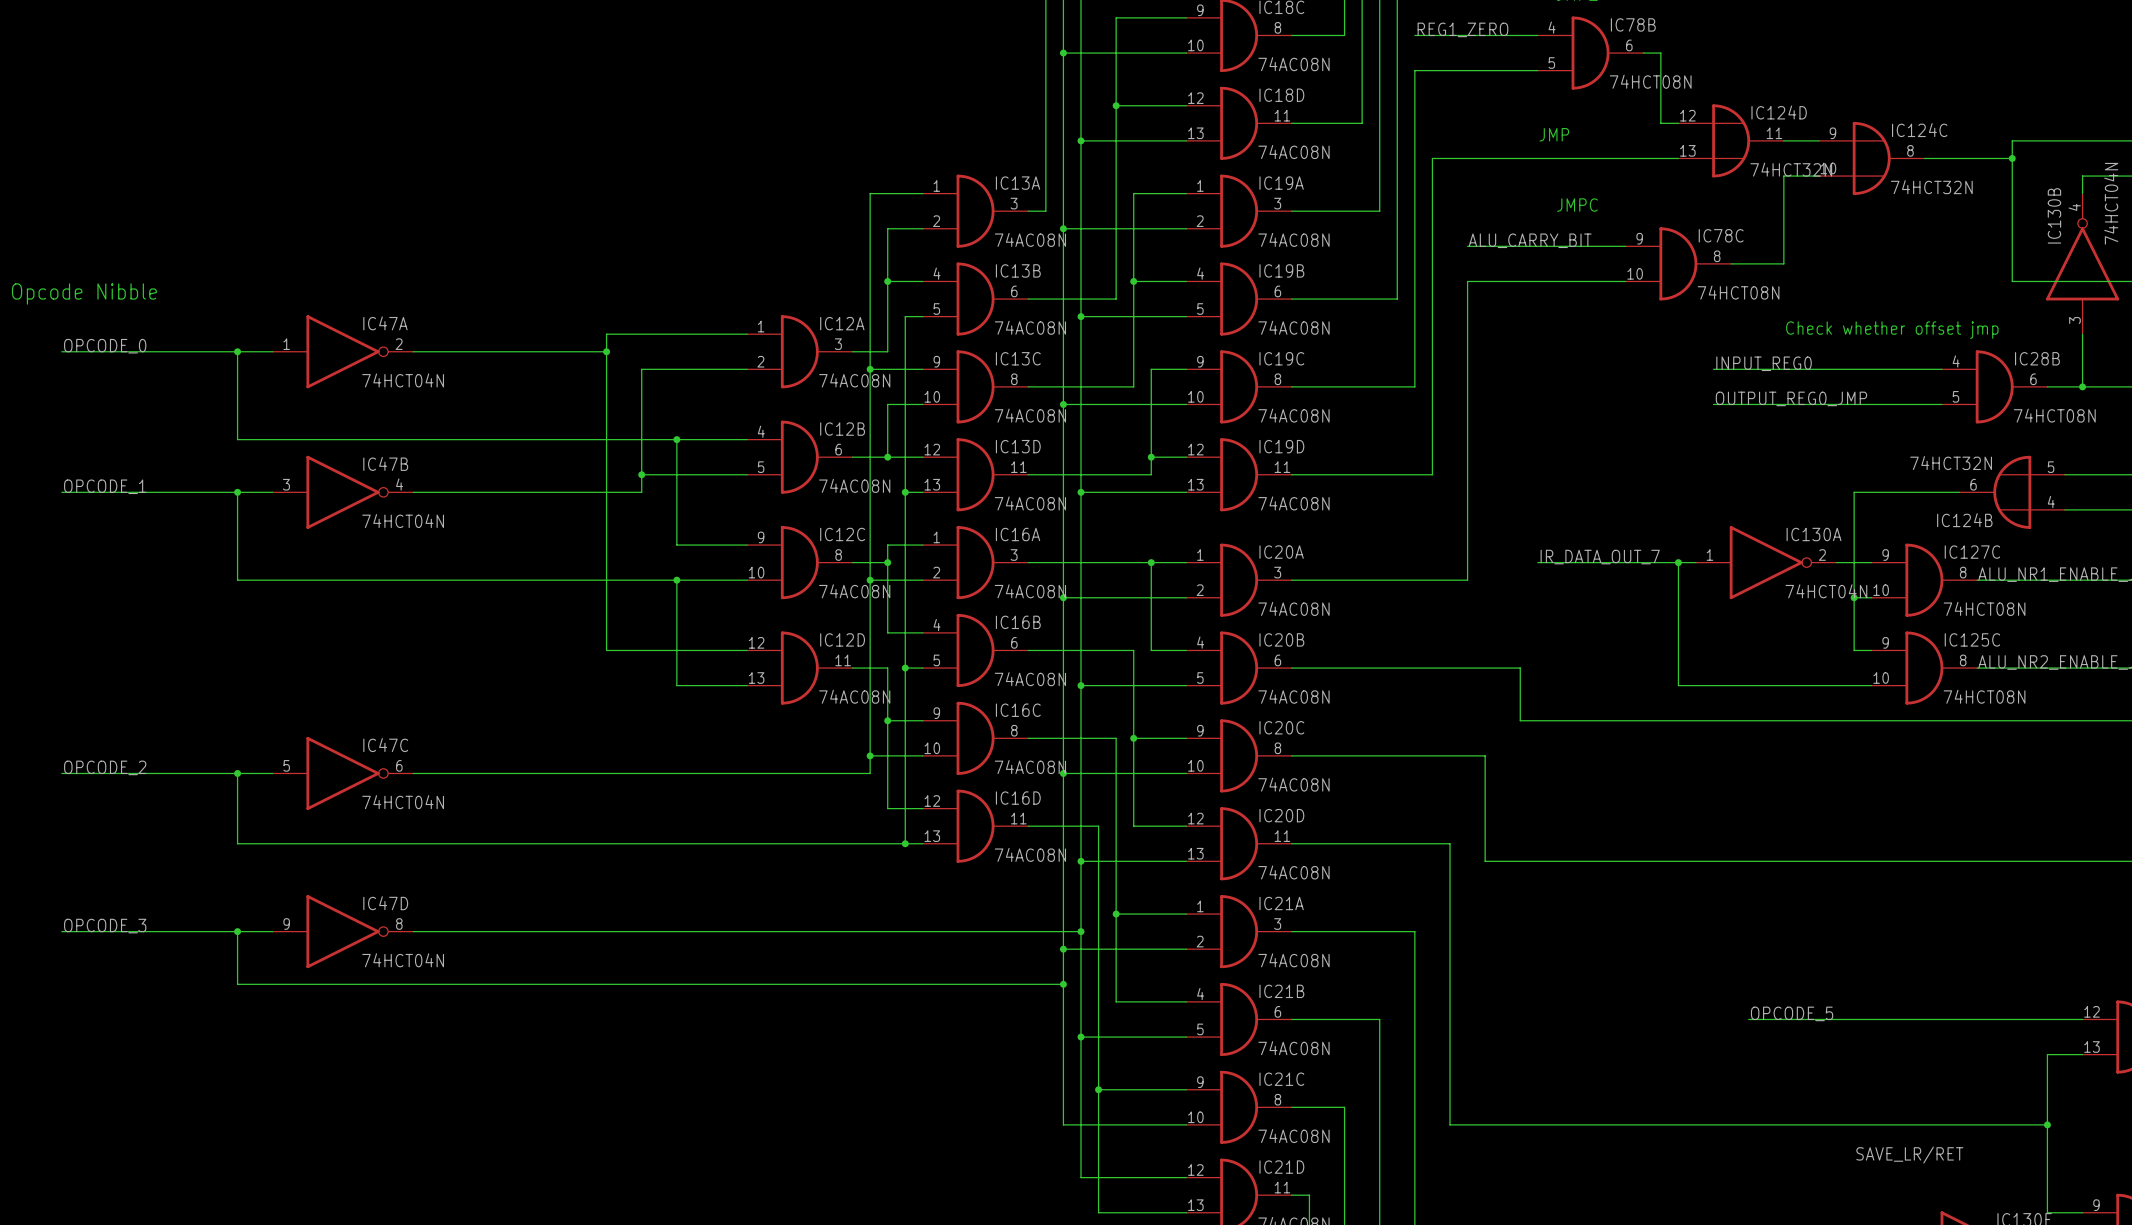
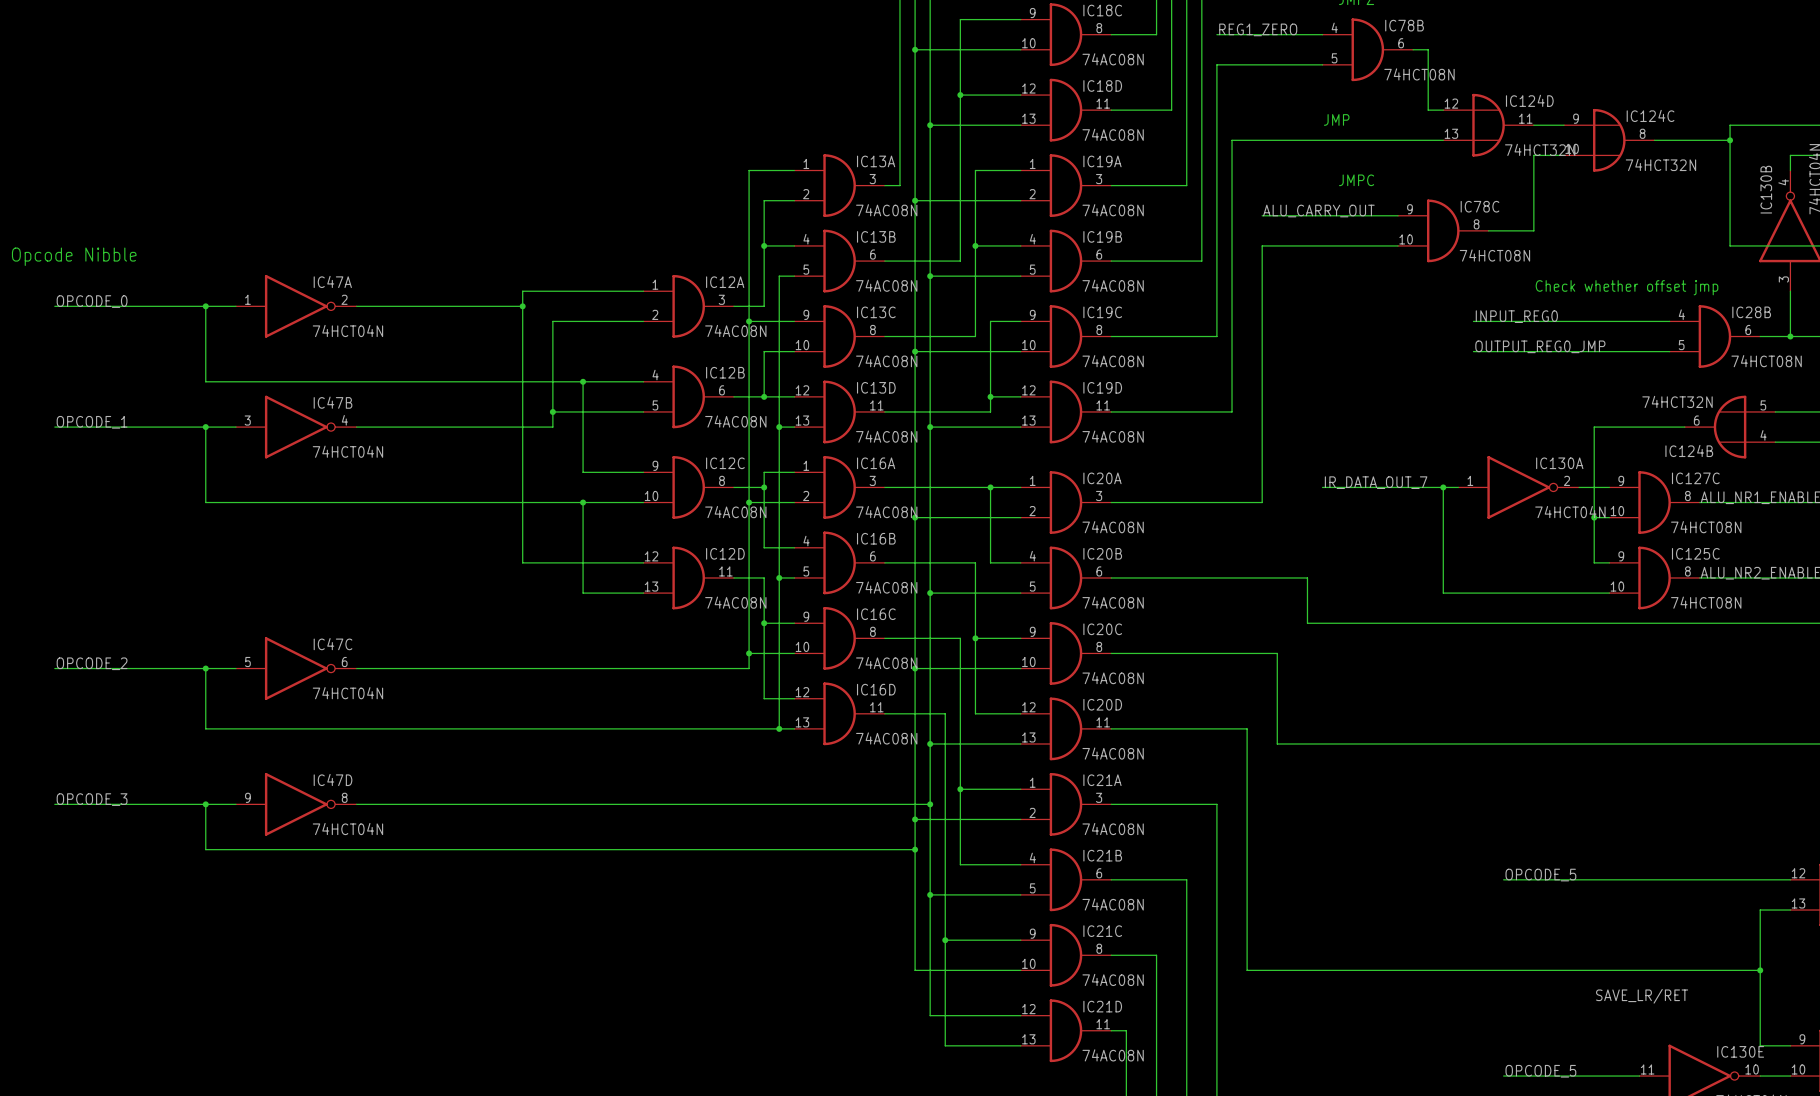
label: ALU_CARRY_BIT (1530, 240) -> ALU_CARRY_OUT (1318, 211)

